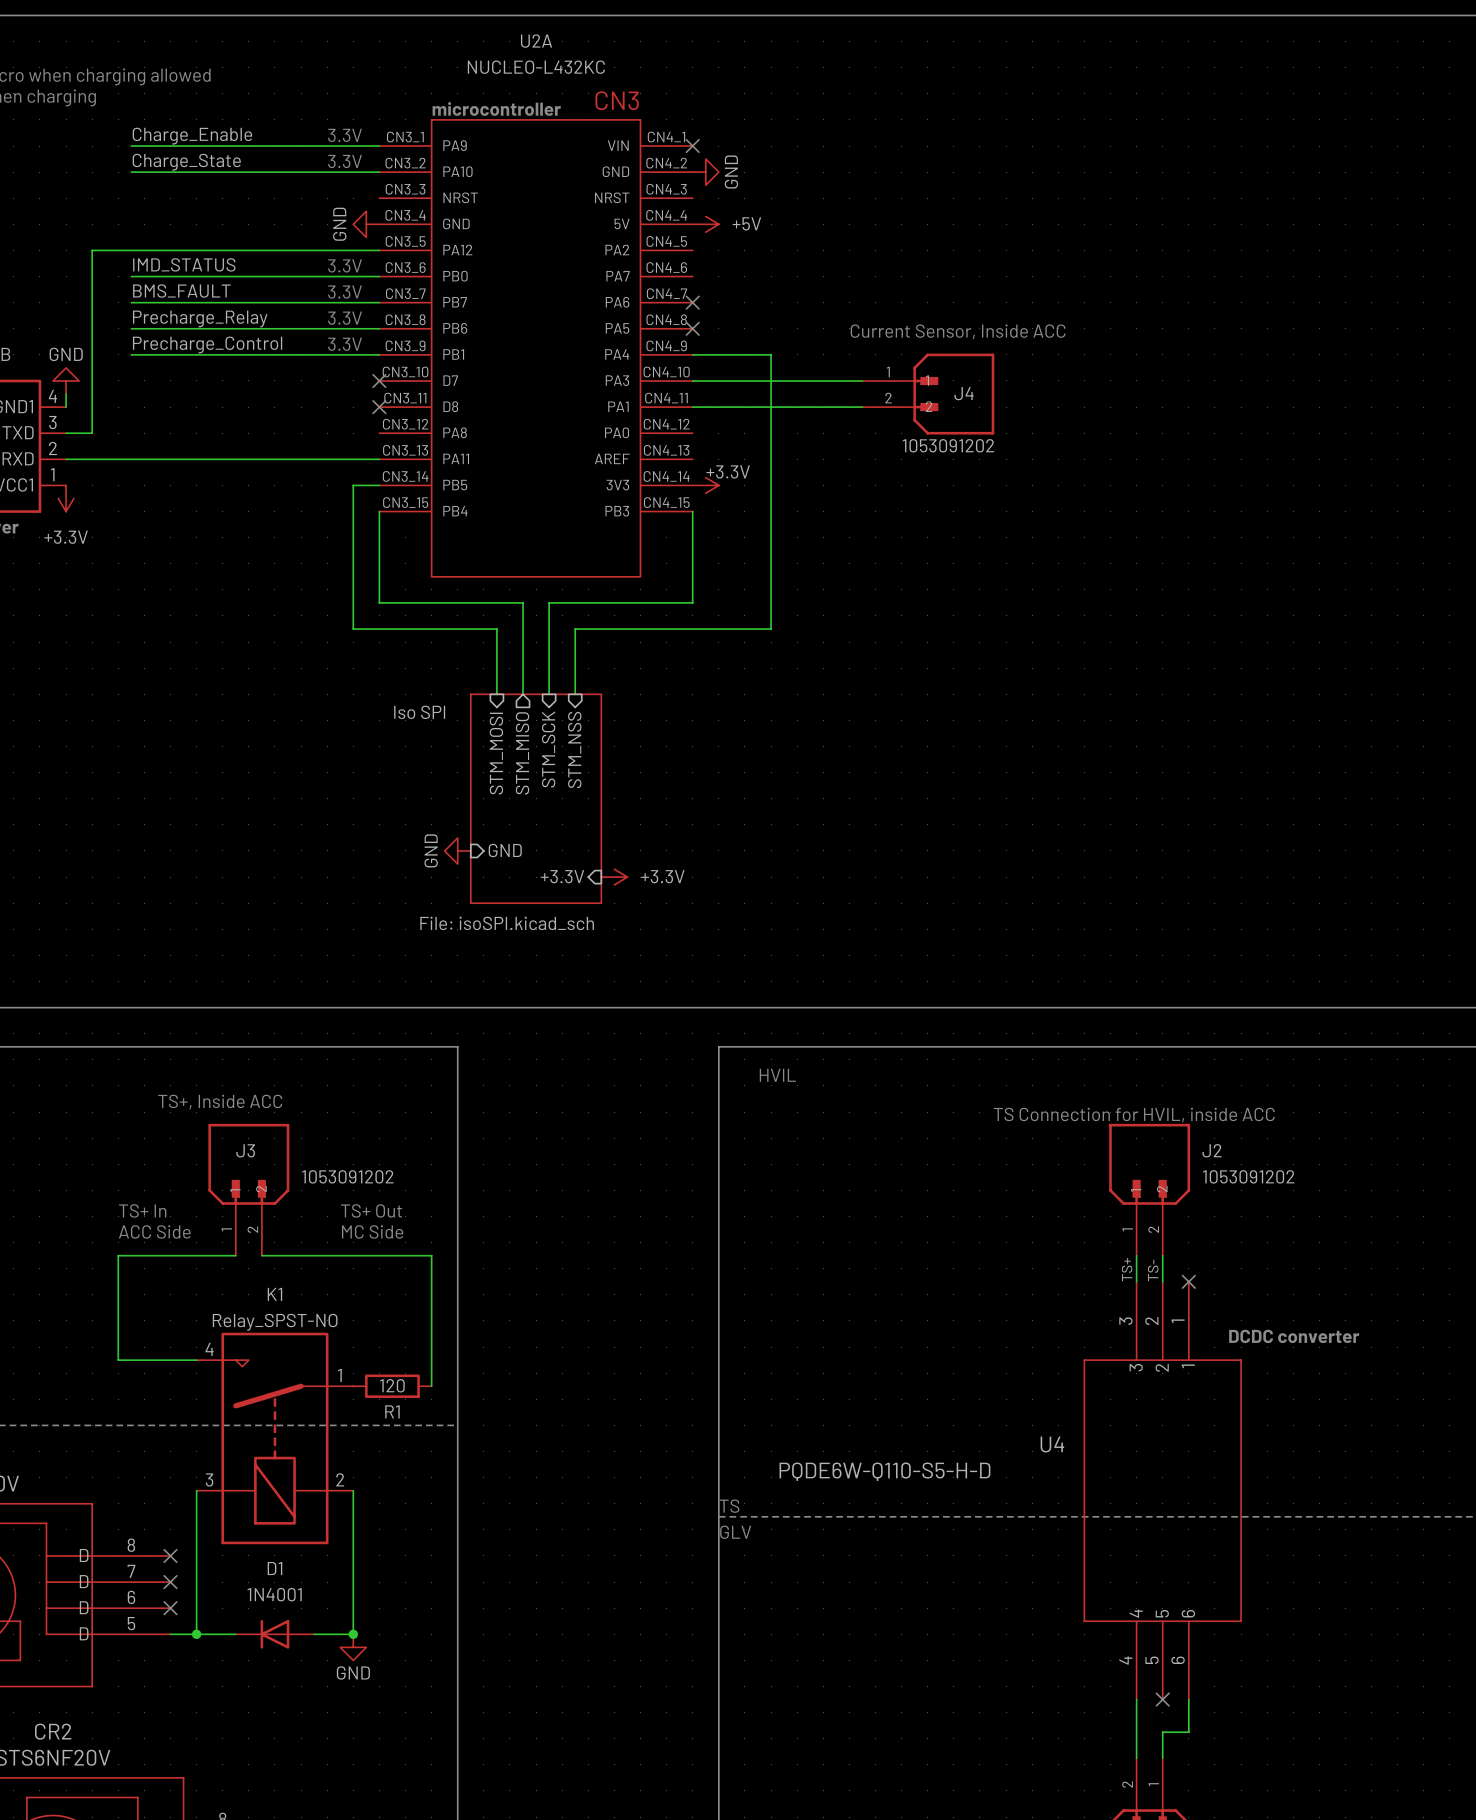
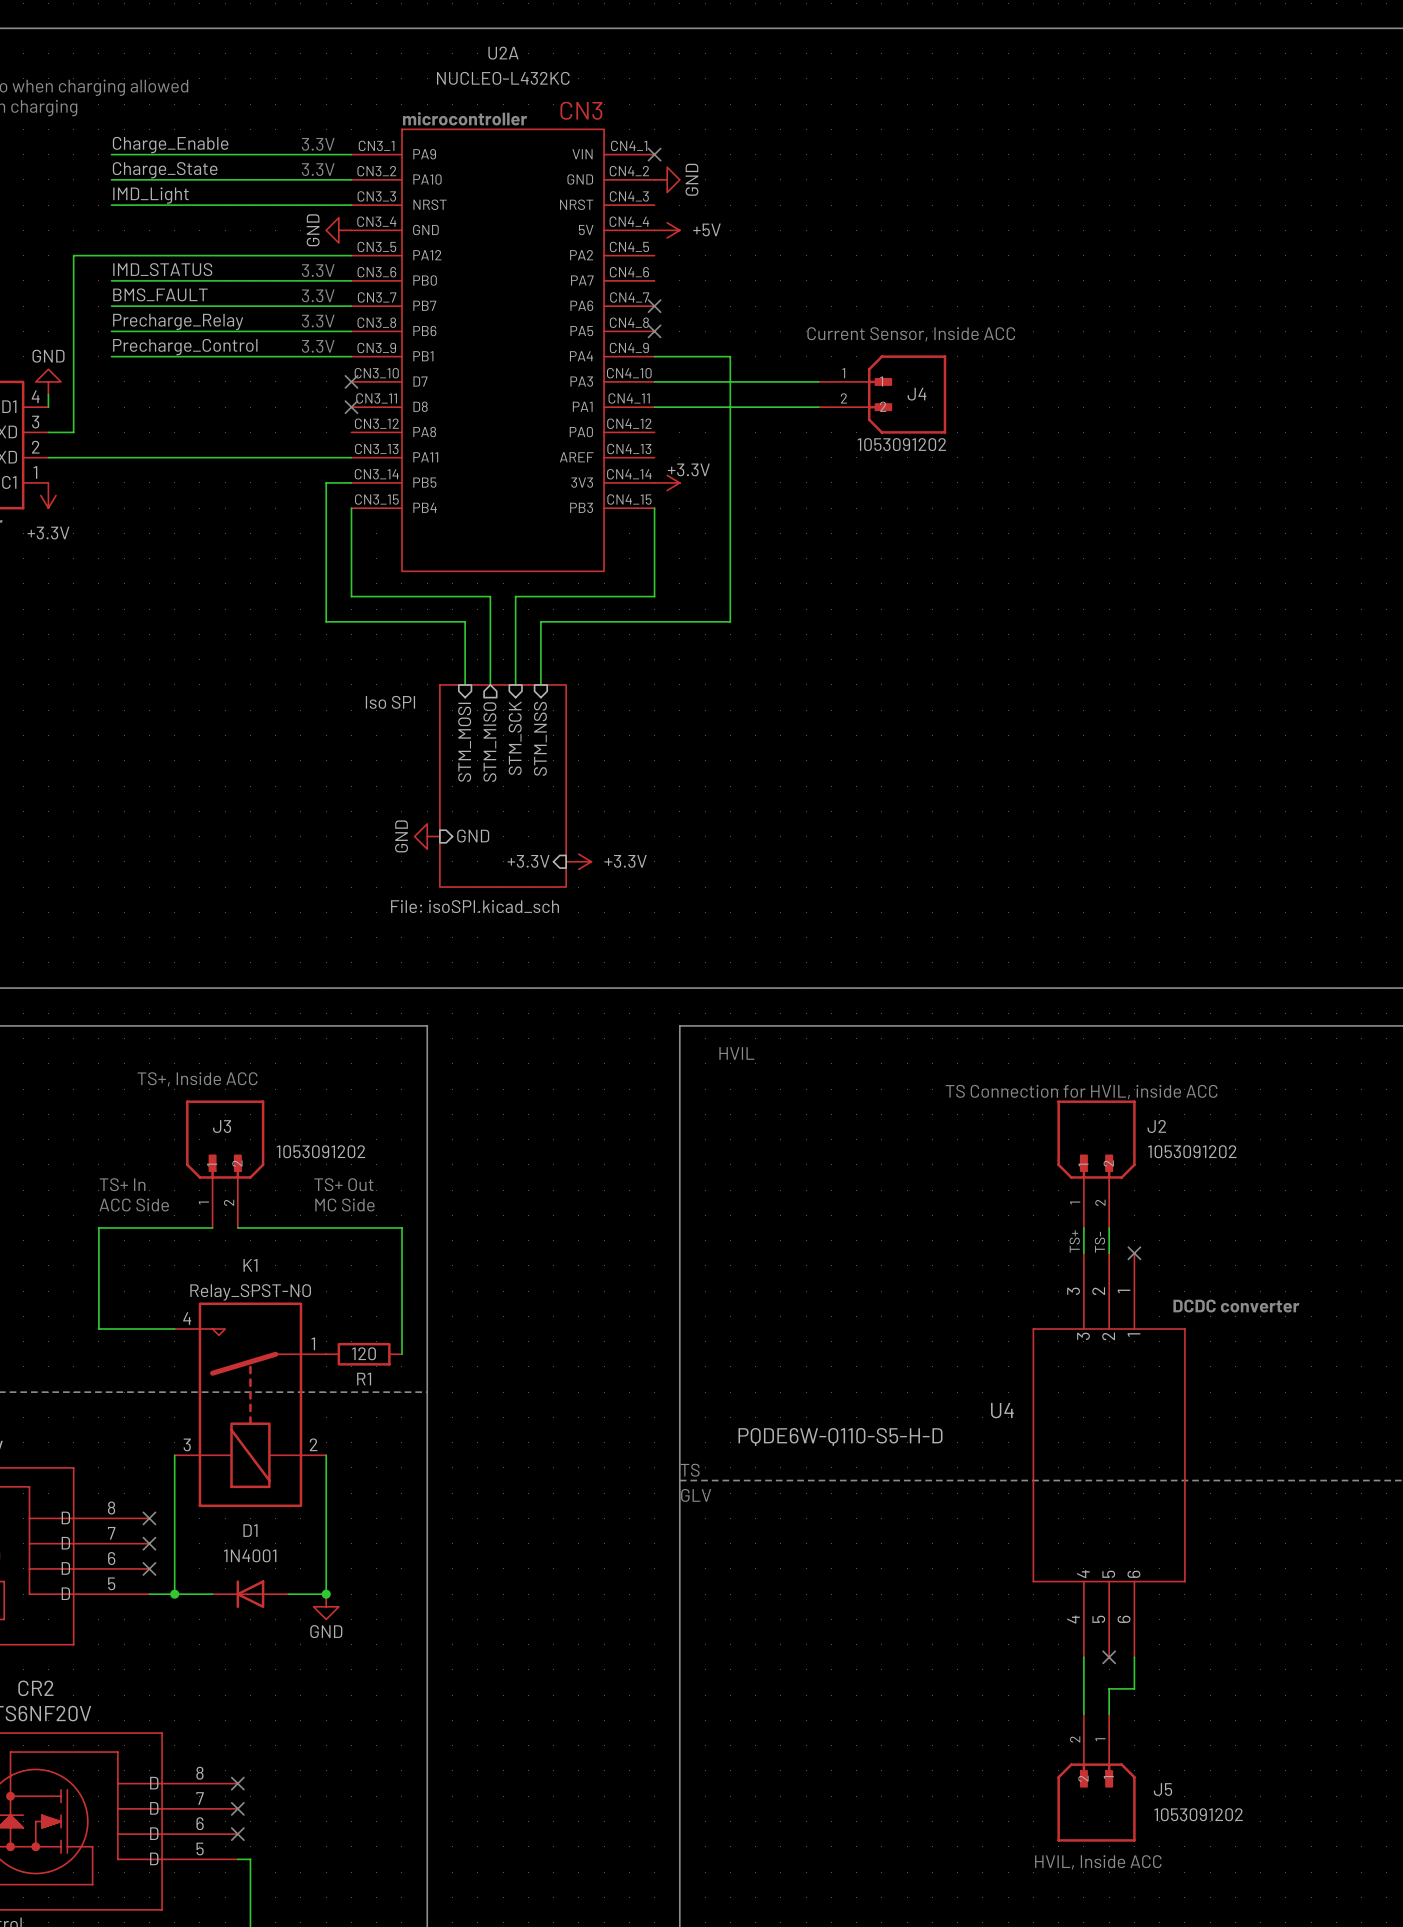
label: none -> IMD_Light (151, 195)
wire: none -> (111, 205) (351, 205)

